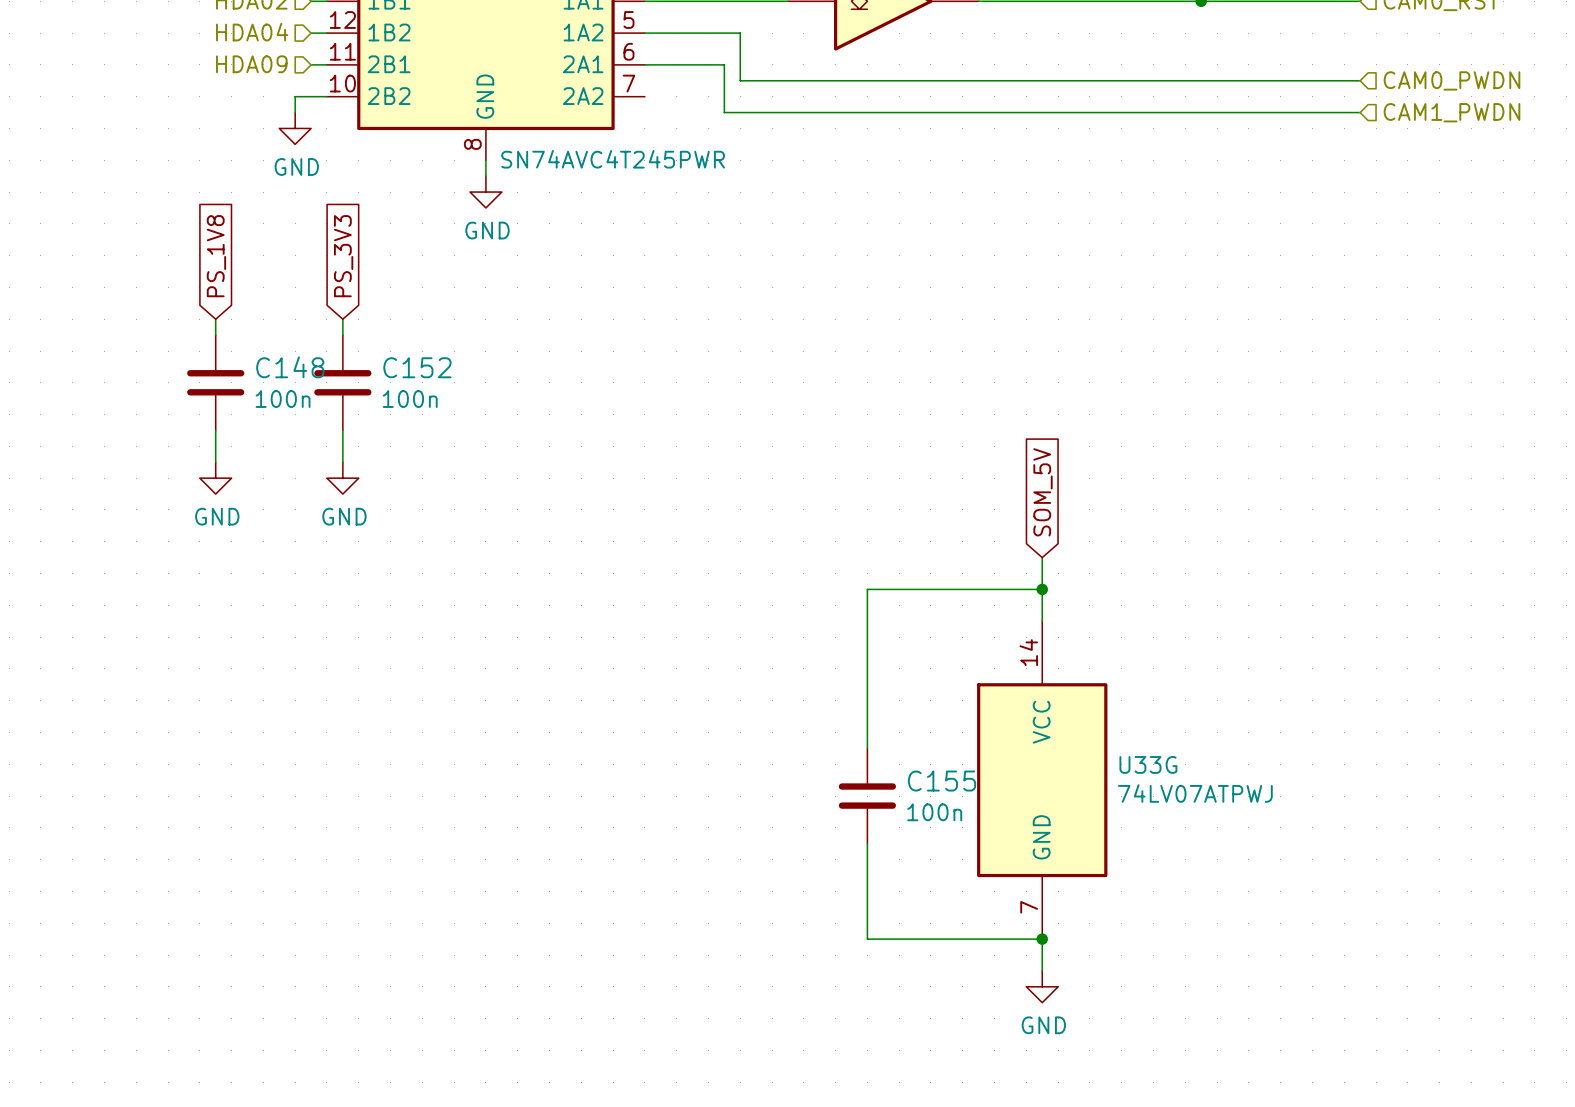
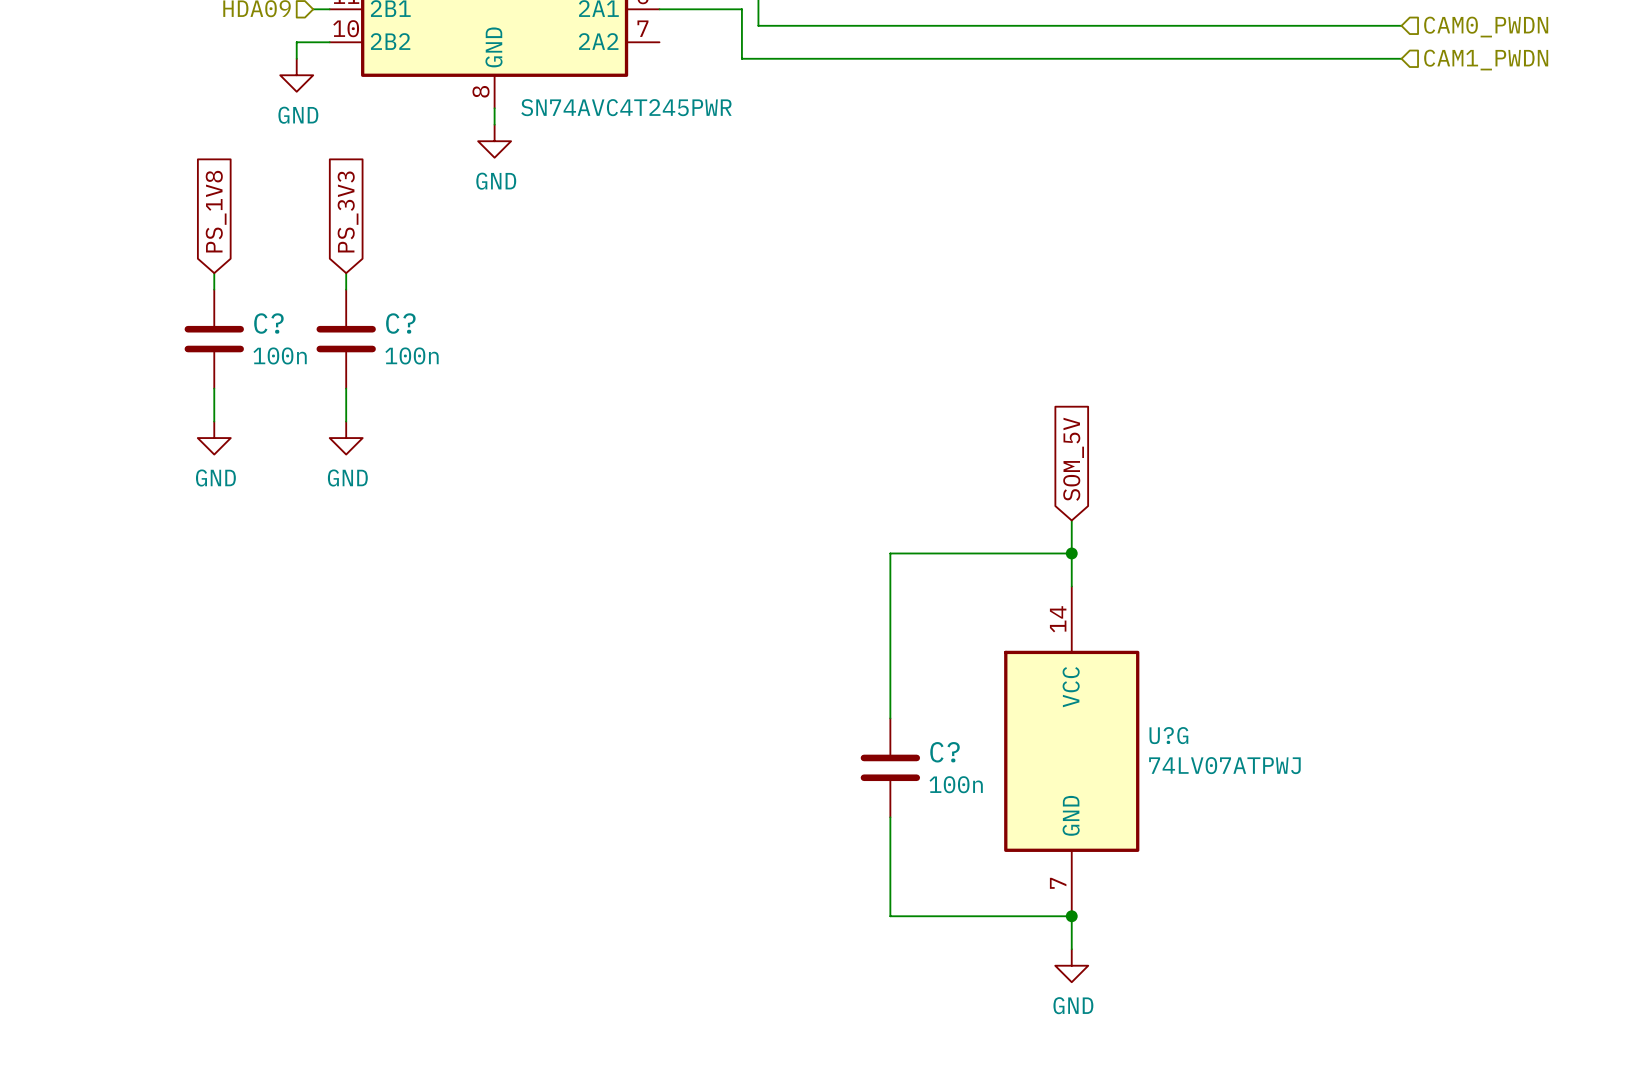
C148 name: C148 (290, 367) -> C? (268, 323)
C152 name: C152 (417, 367) -> C? (400, 323)
U33G name: U33G (1148, 764) -> U?G (1168, 735)
C155 name: C155 (942, 781) -> C? (945, 752)

